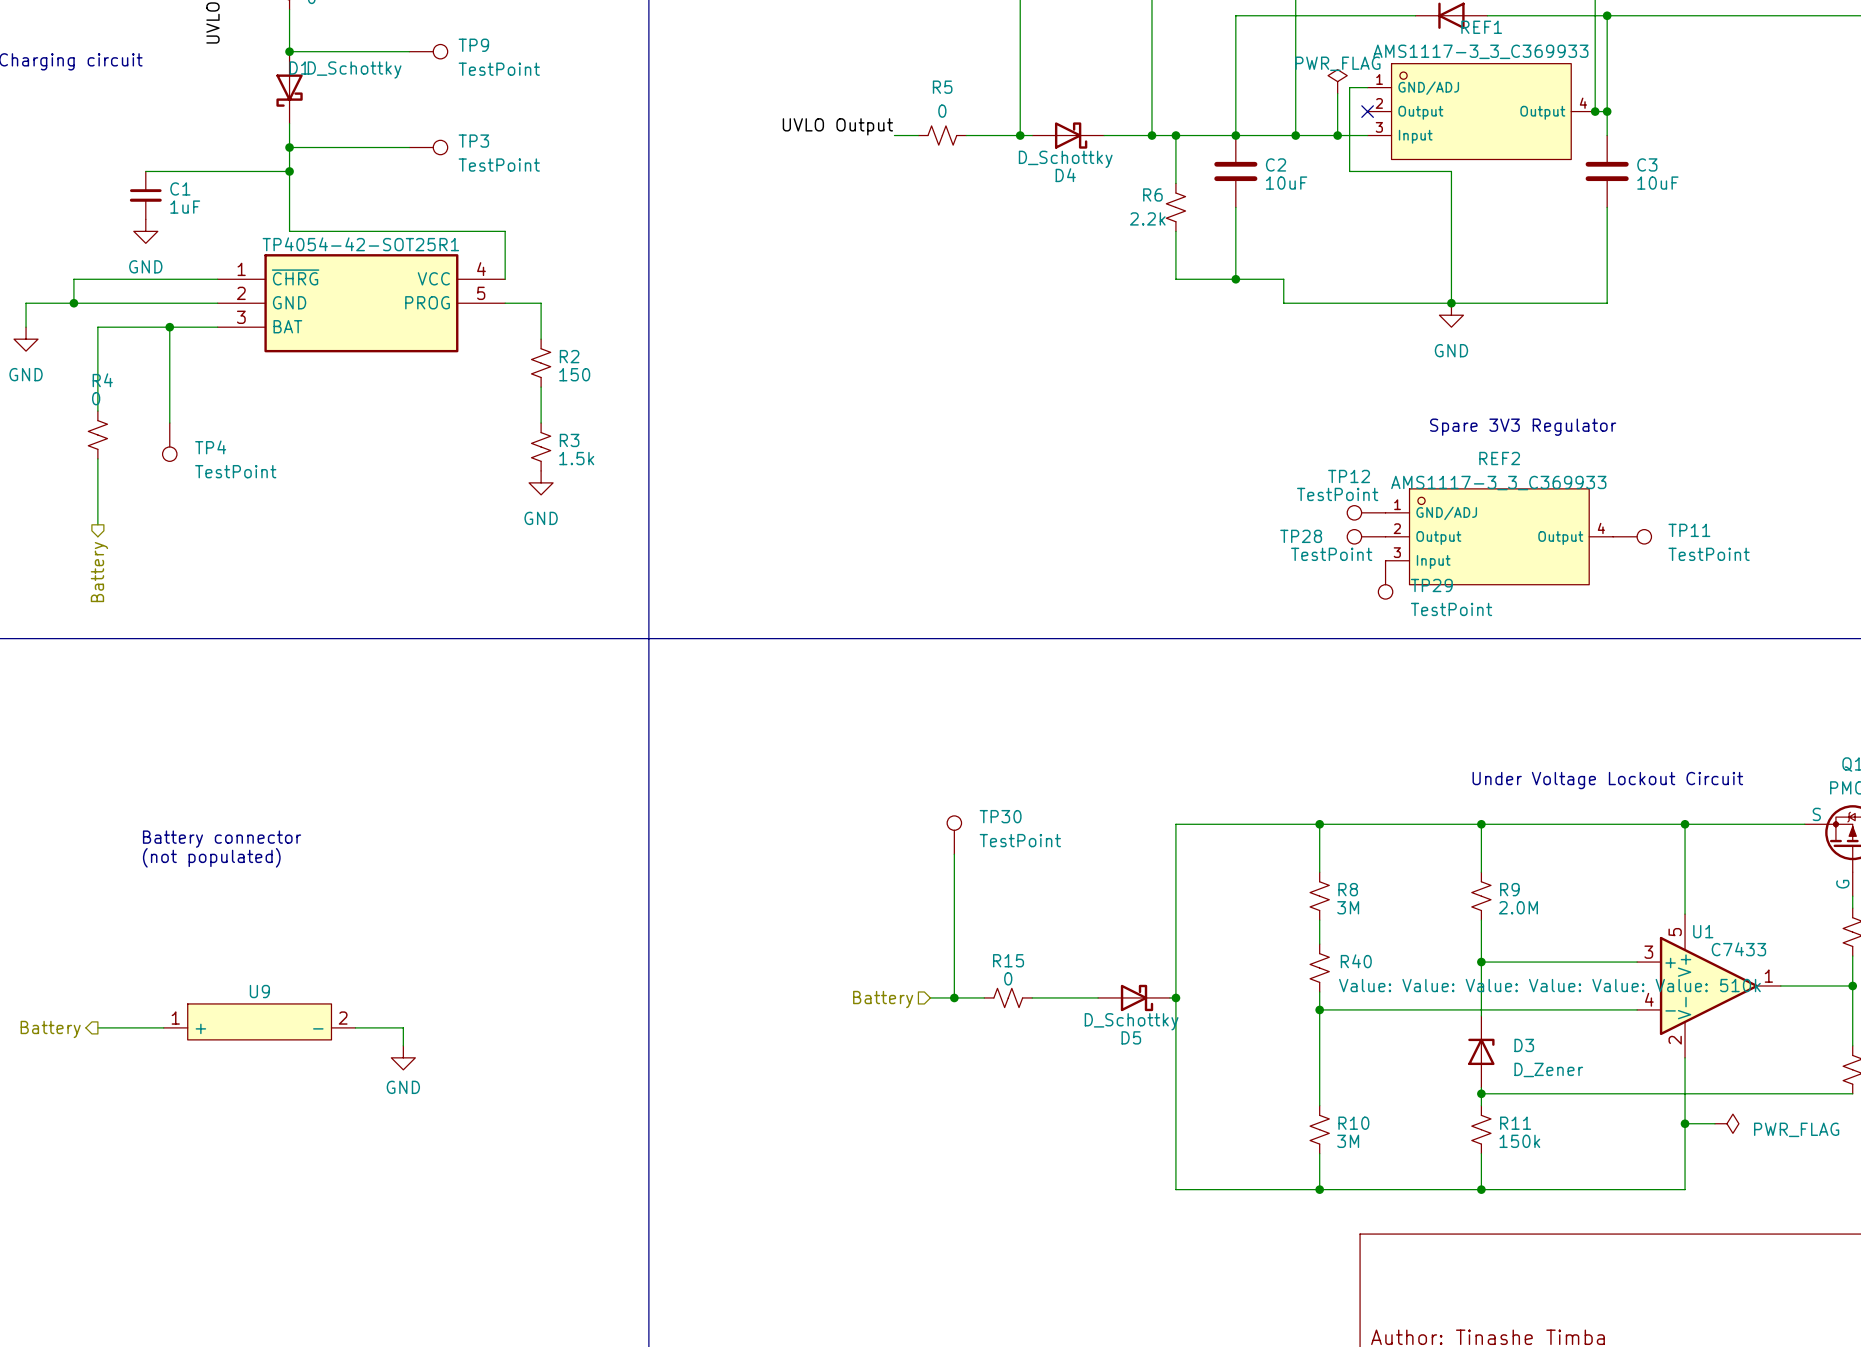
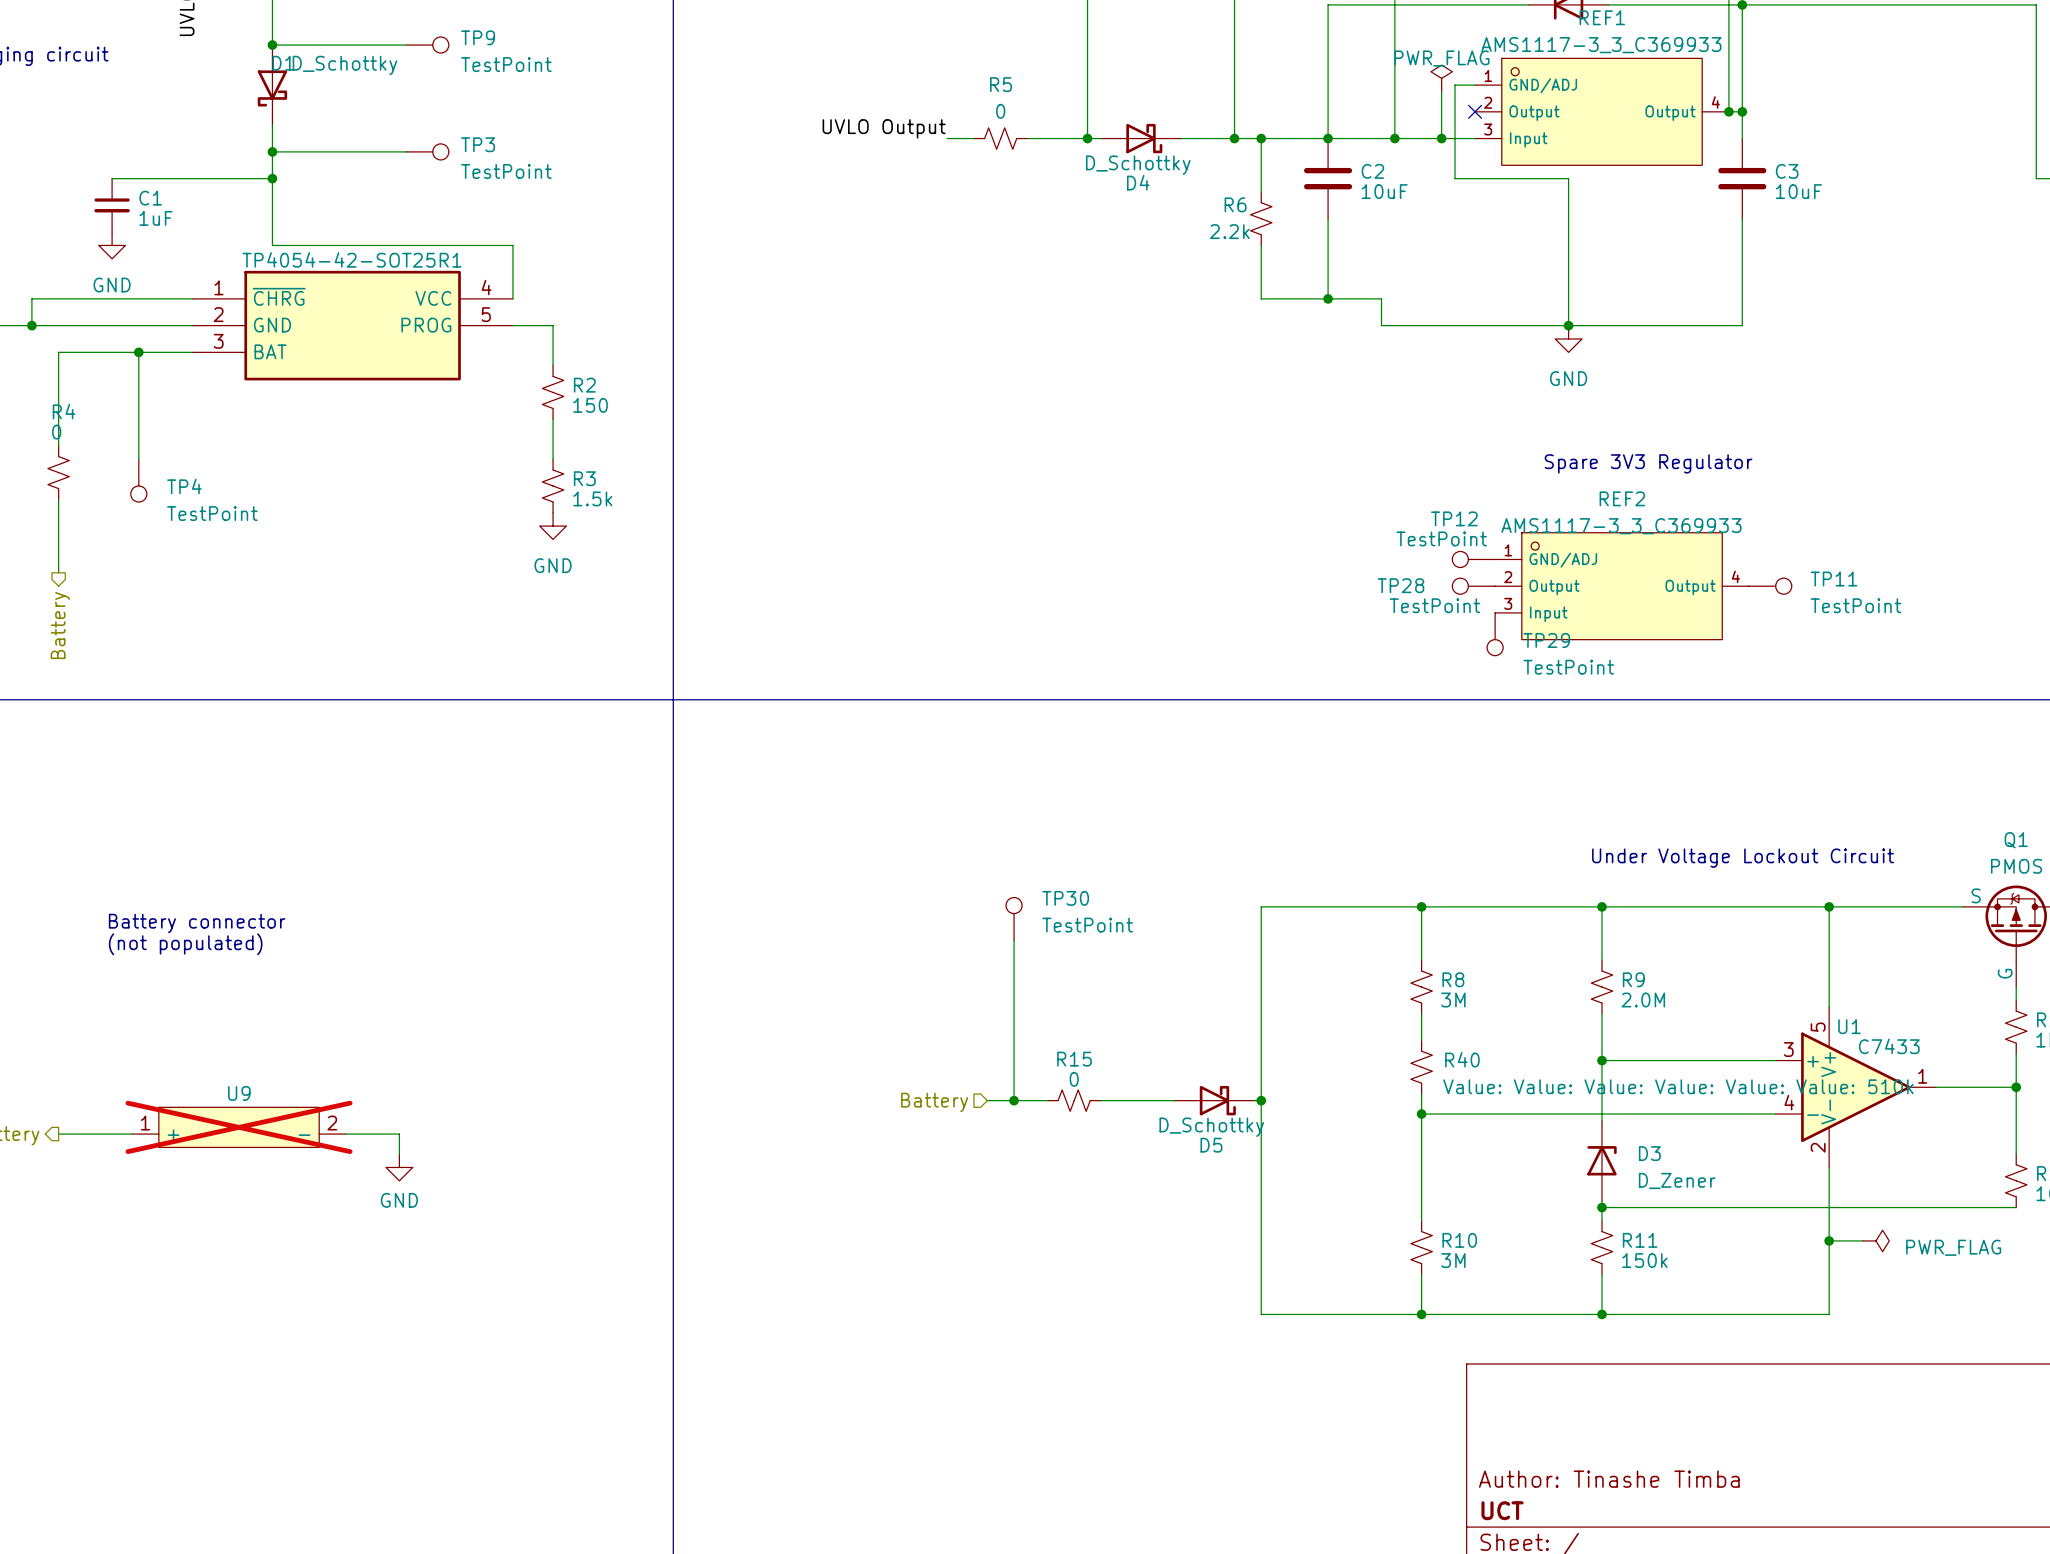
U9 do-not-place cross: none -> (239, 1127)

